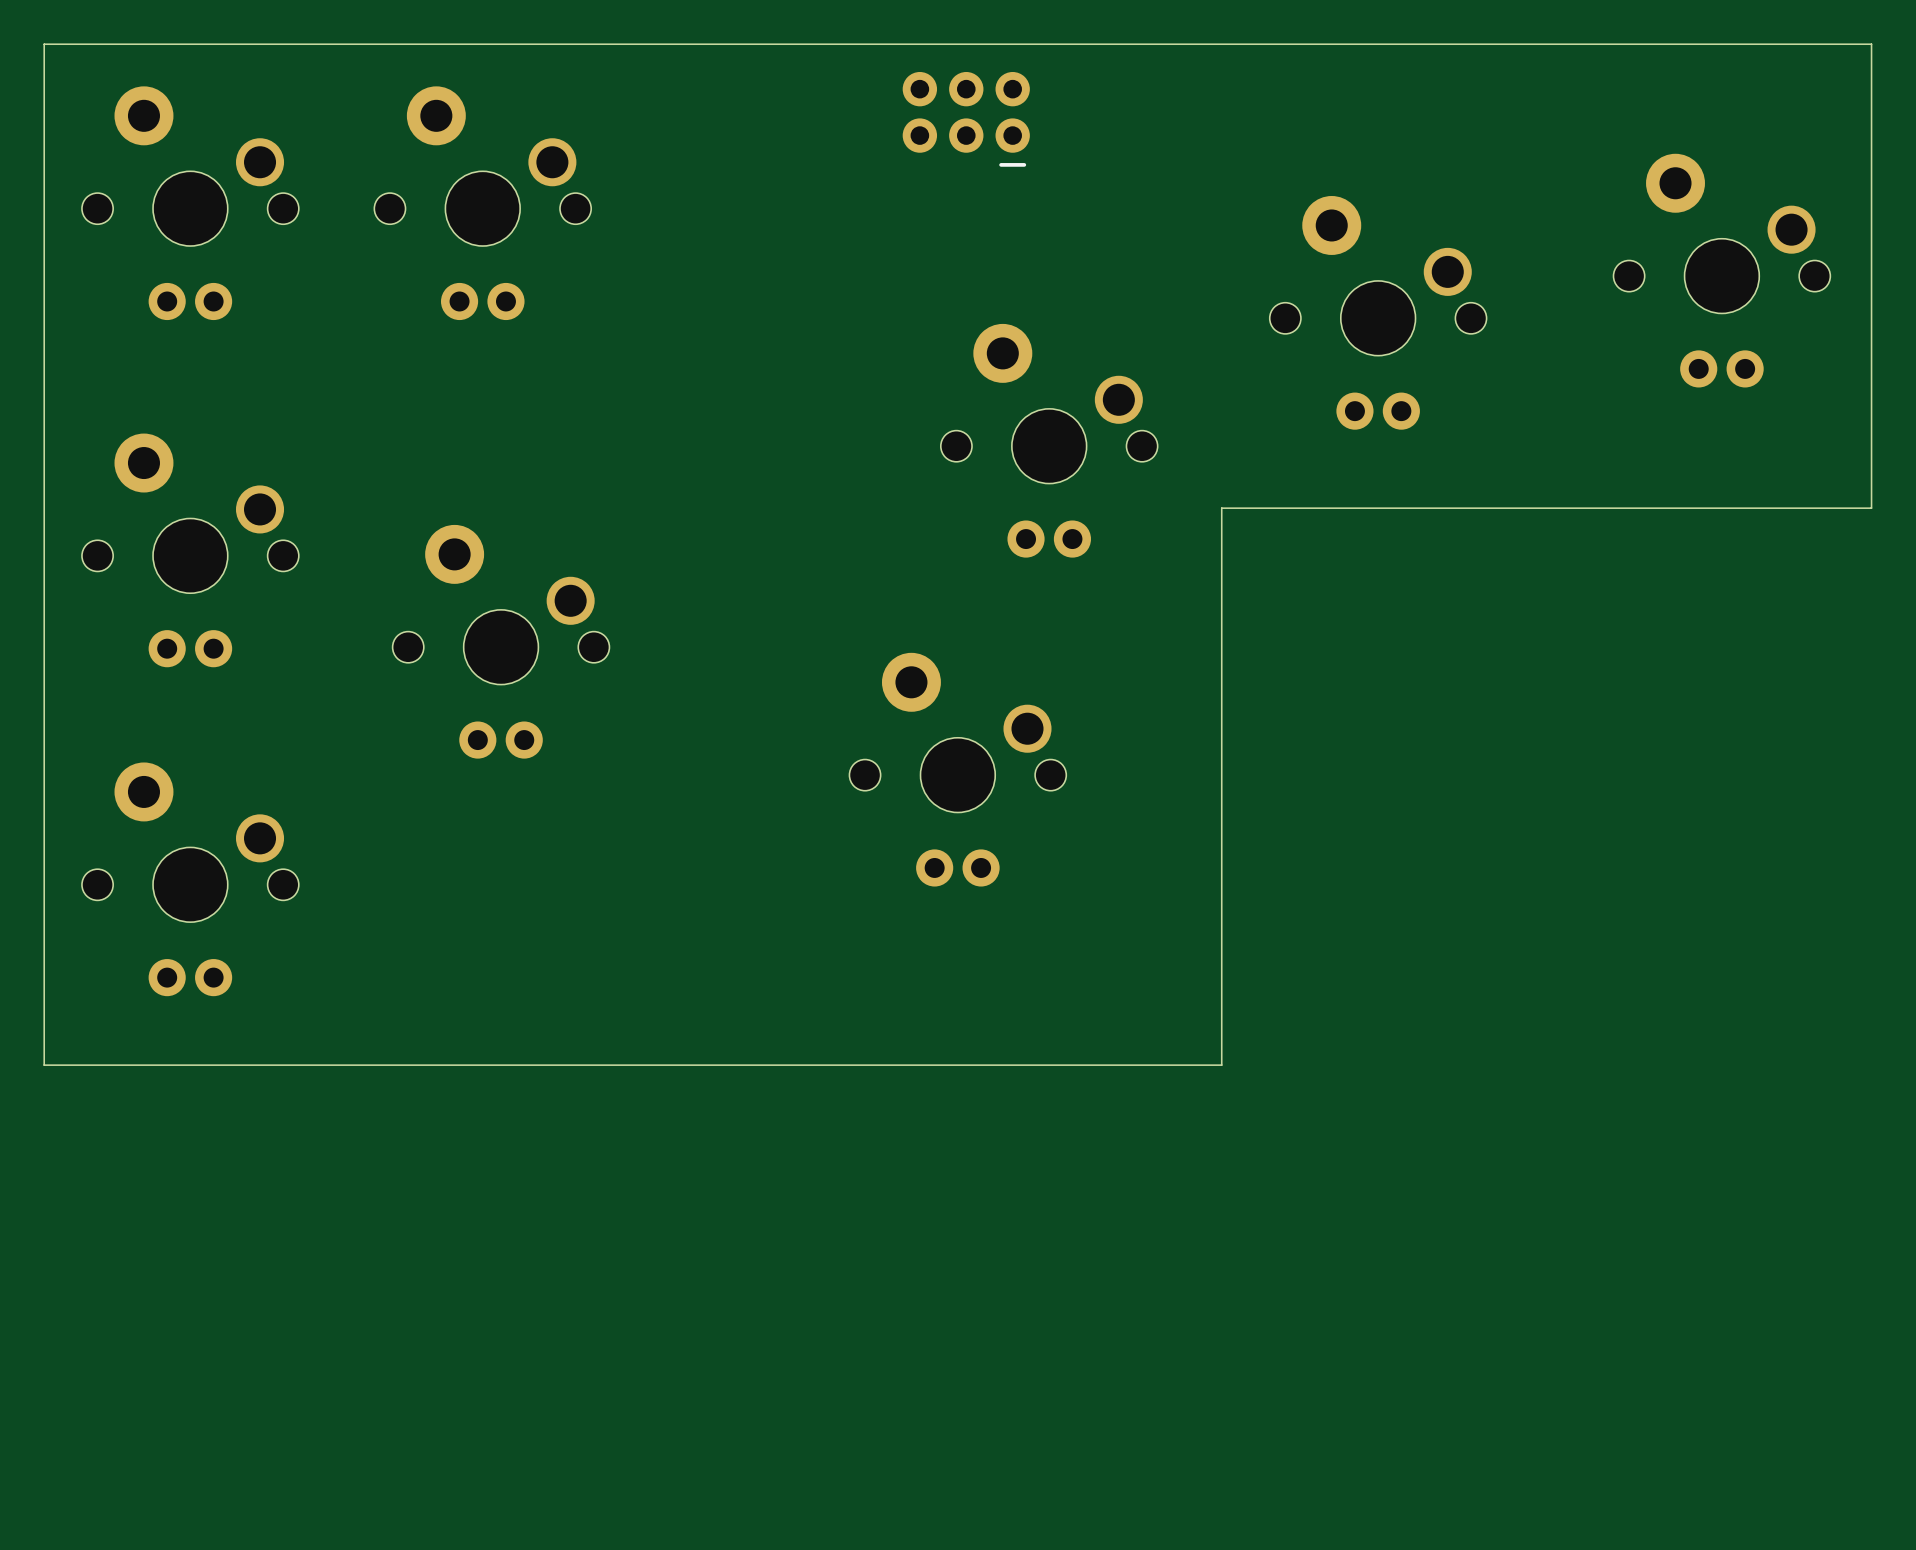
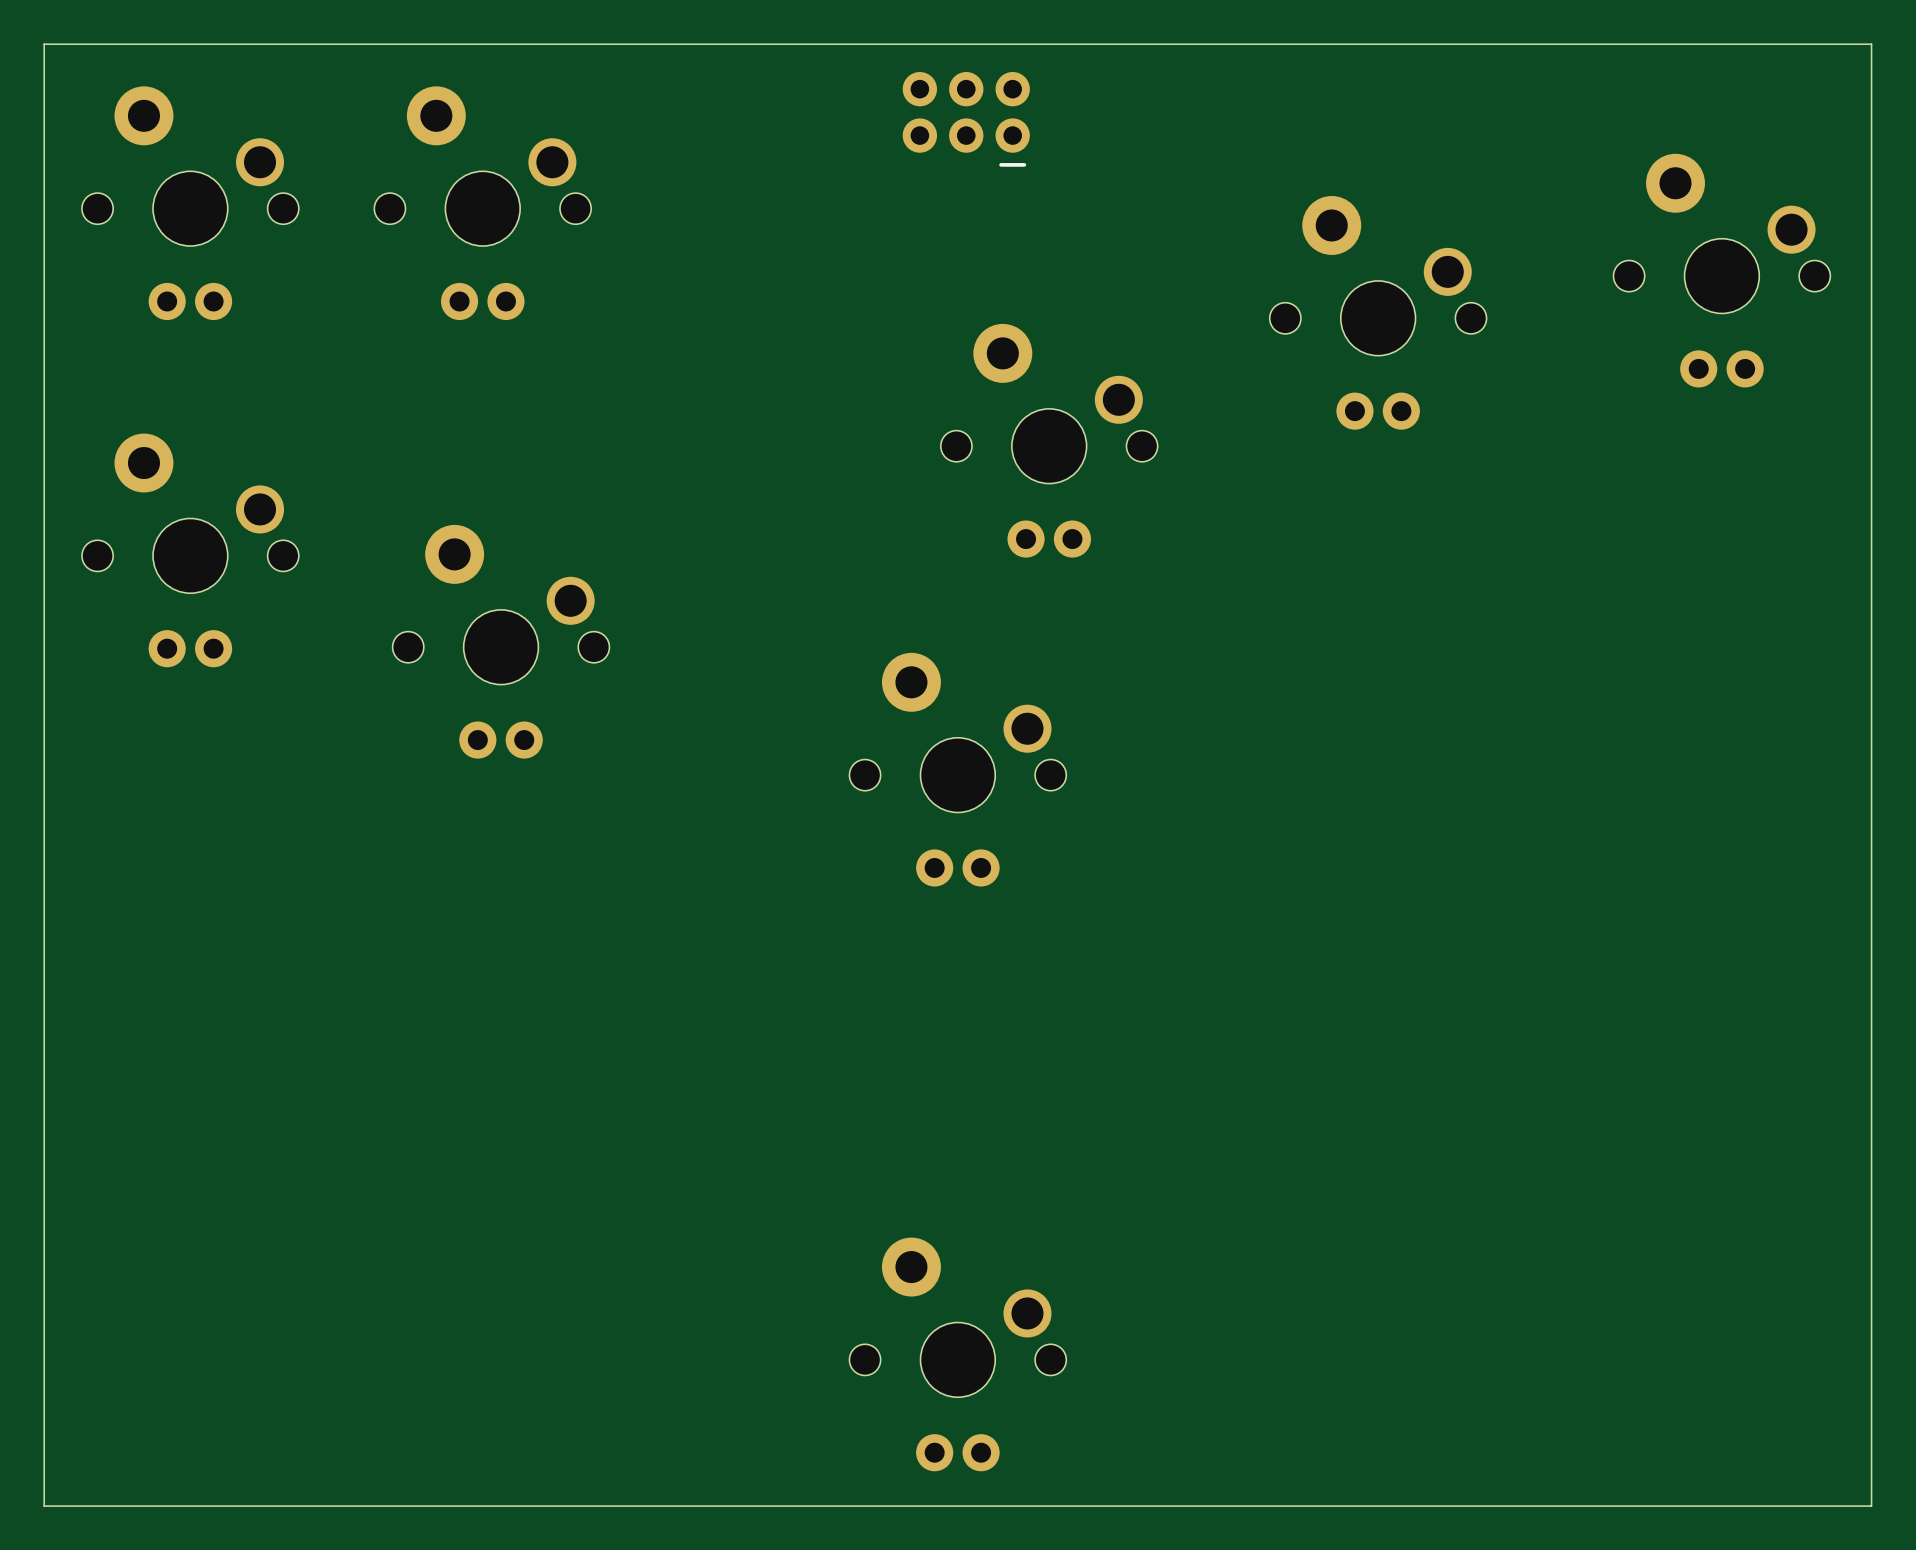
board edge: (1871, 508) (1221, 508) (1221, 1065) (44, 1065) -> (1871, 508) (1871, 1506) (44, 1506) (44, 1065)
part: (190, 879) -> none
part: none -> (957, 1354)

